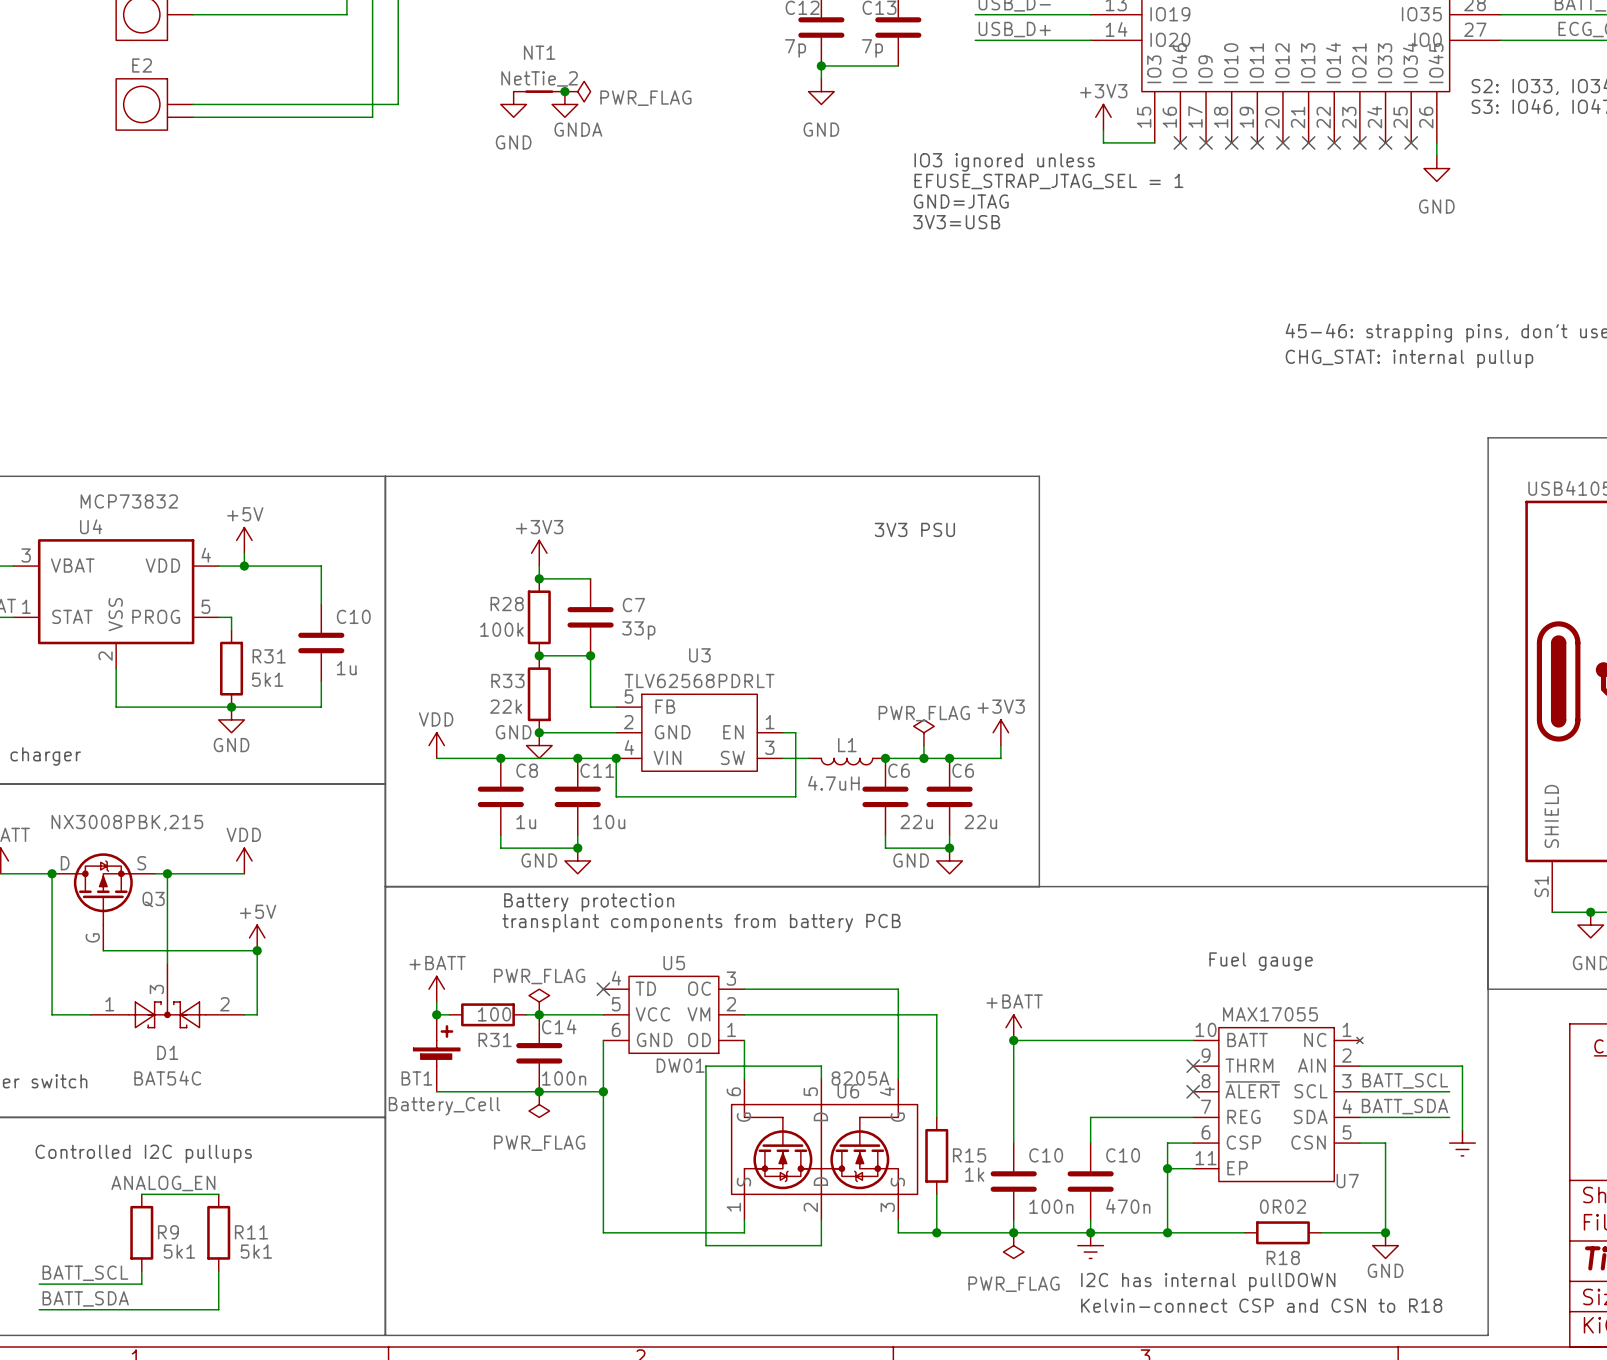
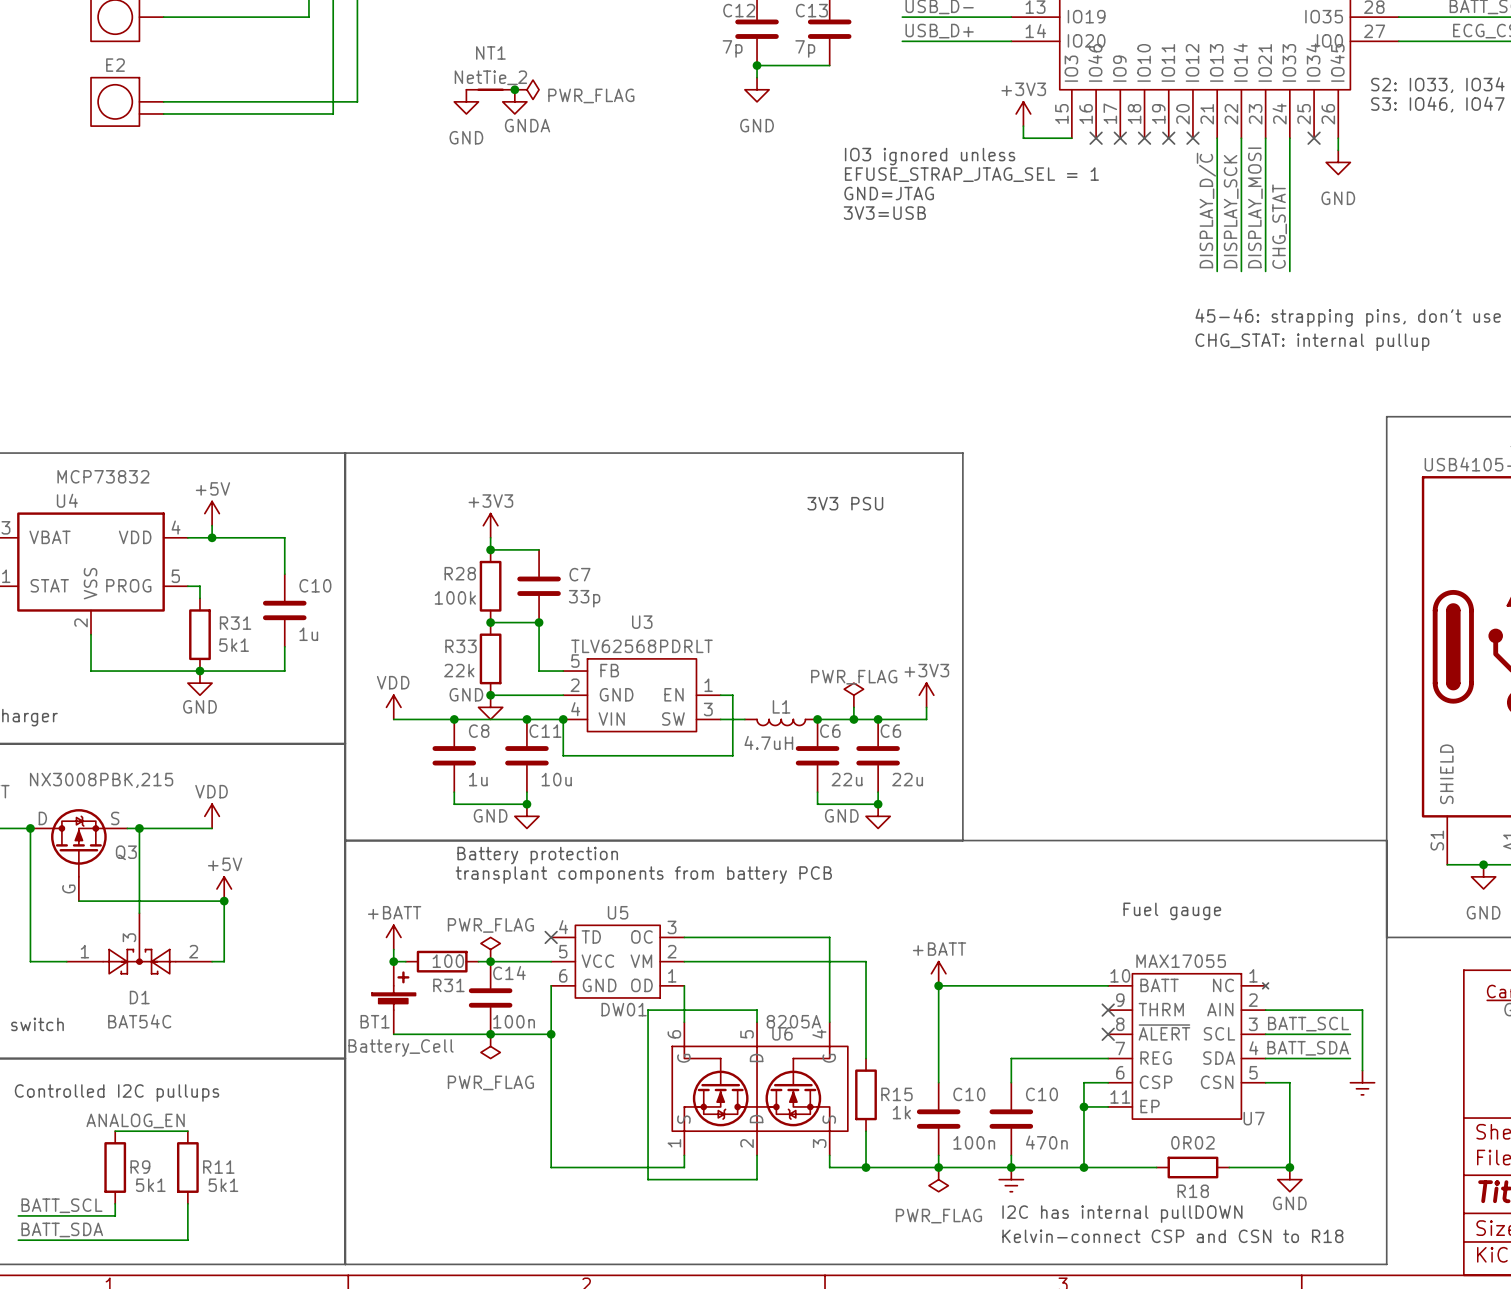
wire: none -> (1217, 138) (1217, 271)
no-connect mark: (1308, 142) -> none
wire: none -> (1241, 138) (1241, 271)
no-connect mark: (1334, 142) -> none
wire: none -> (1265, 138) (1265, 271)
no-connect mark: (1359, 142) -> none
wire: none -> (1289, 138) (1289, 271)
no-connect mark: (1385, 142) -> none
label: none -> DISPLAY_MOSI (1255, 207)
label: none -> DISPLAY_D/~{C} (1206, 210)
label: none -> DISPLAY_SCK (1231, 211)
label: none -> CHG_STAT (1279, 226)

